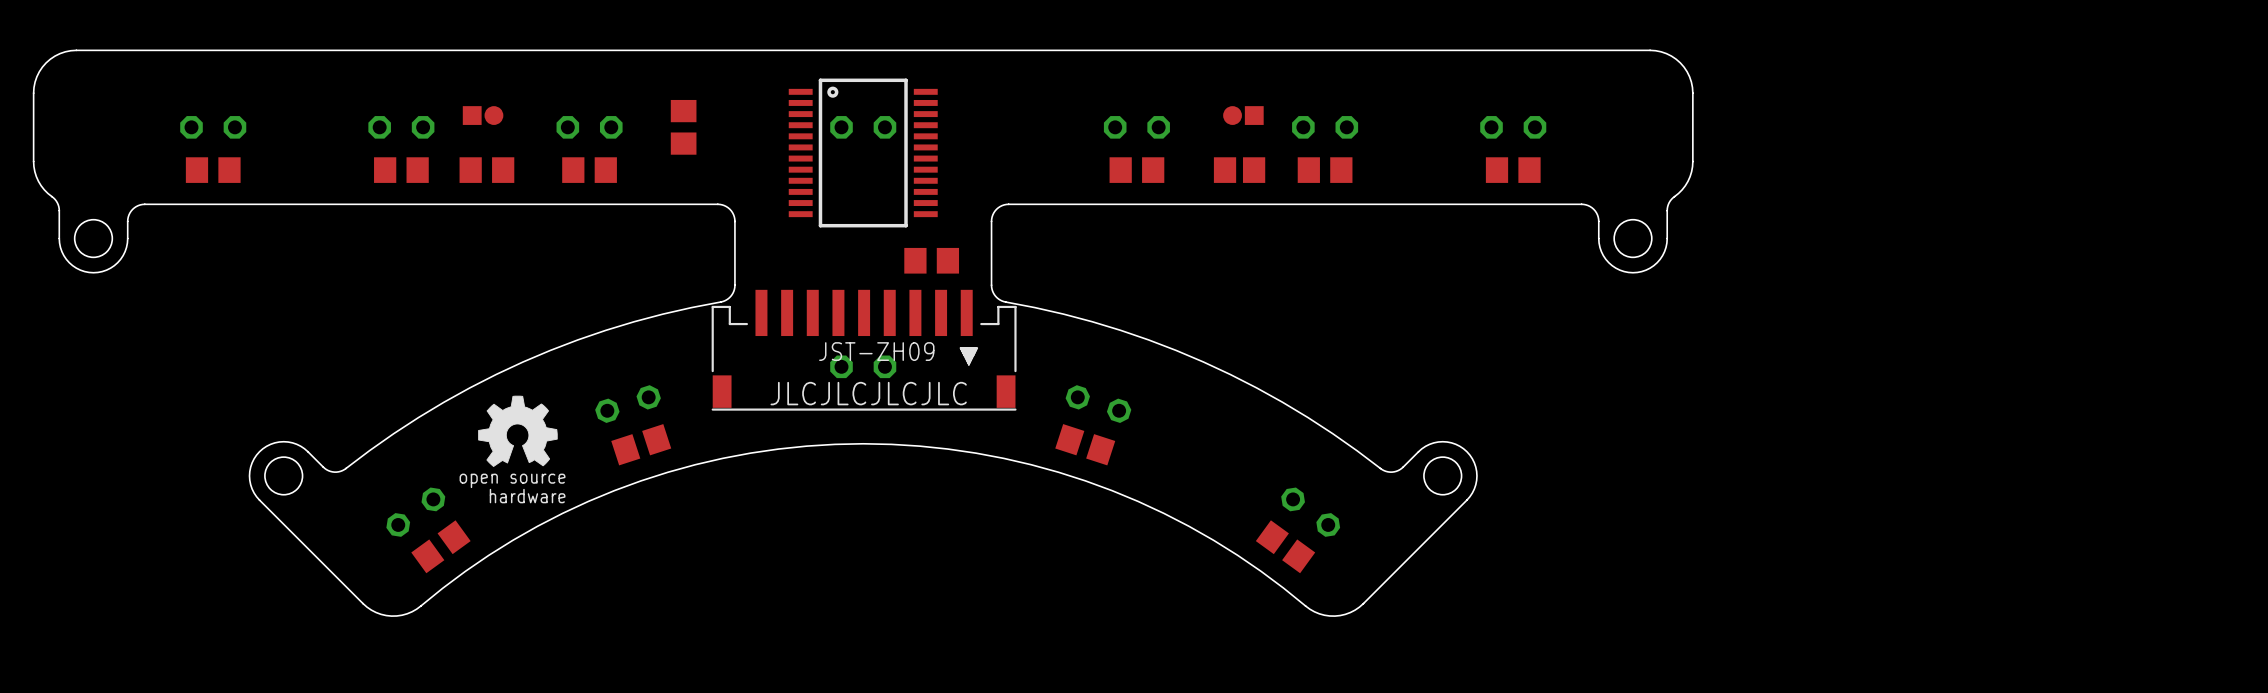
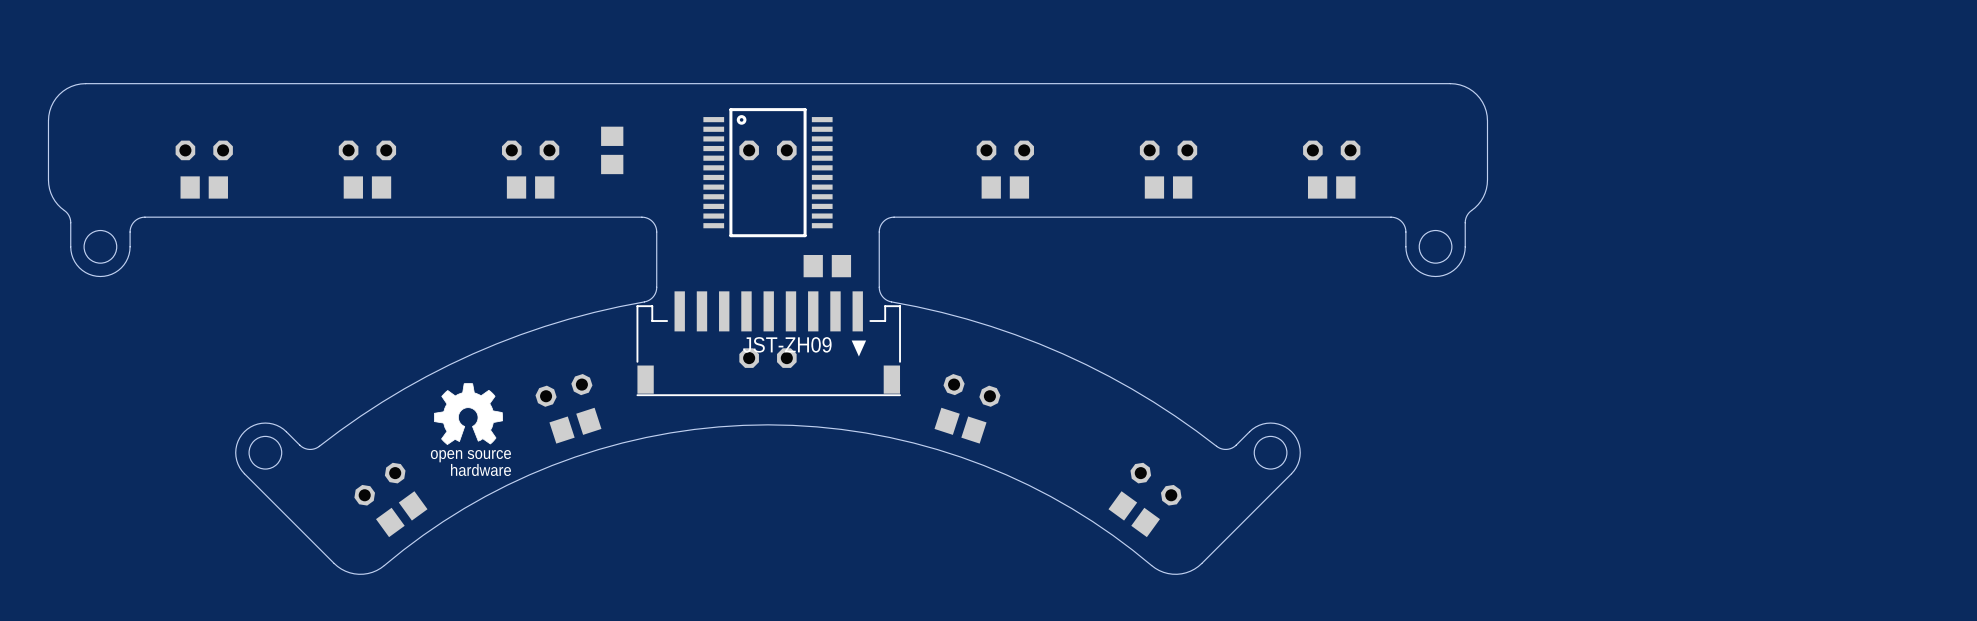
part: (472, 115) -> none
part: (493, 115) -> none
part: (1232, 115) -> none
part: (1254, 115) -> none
part: (486, 170) -> none
part: (1239, 170) -> none
text: JLCJLCJLCJLC (868, 393) -> none

